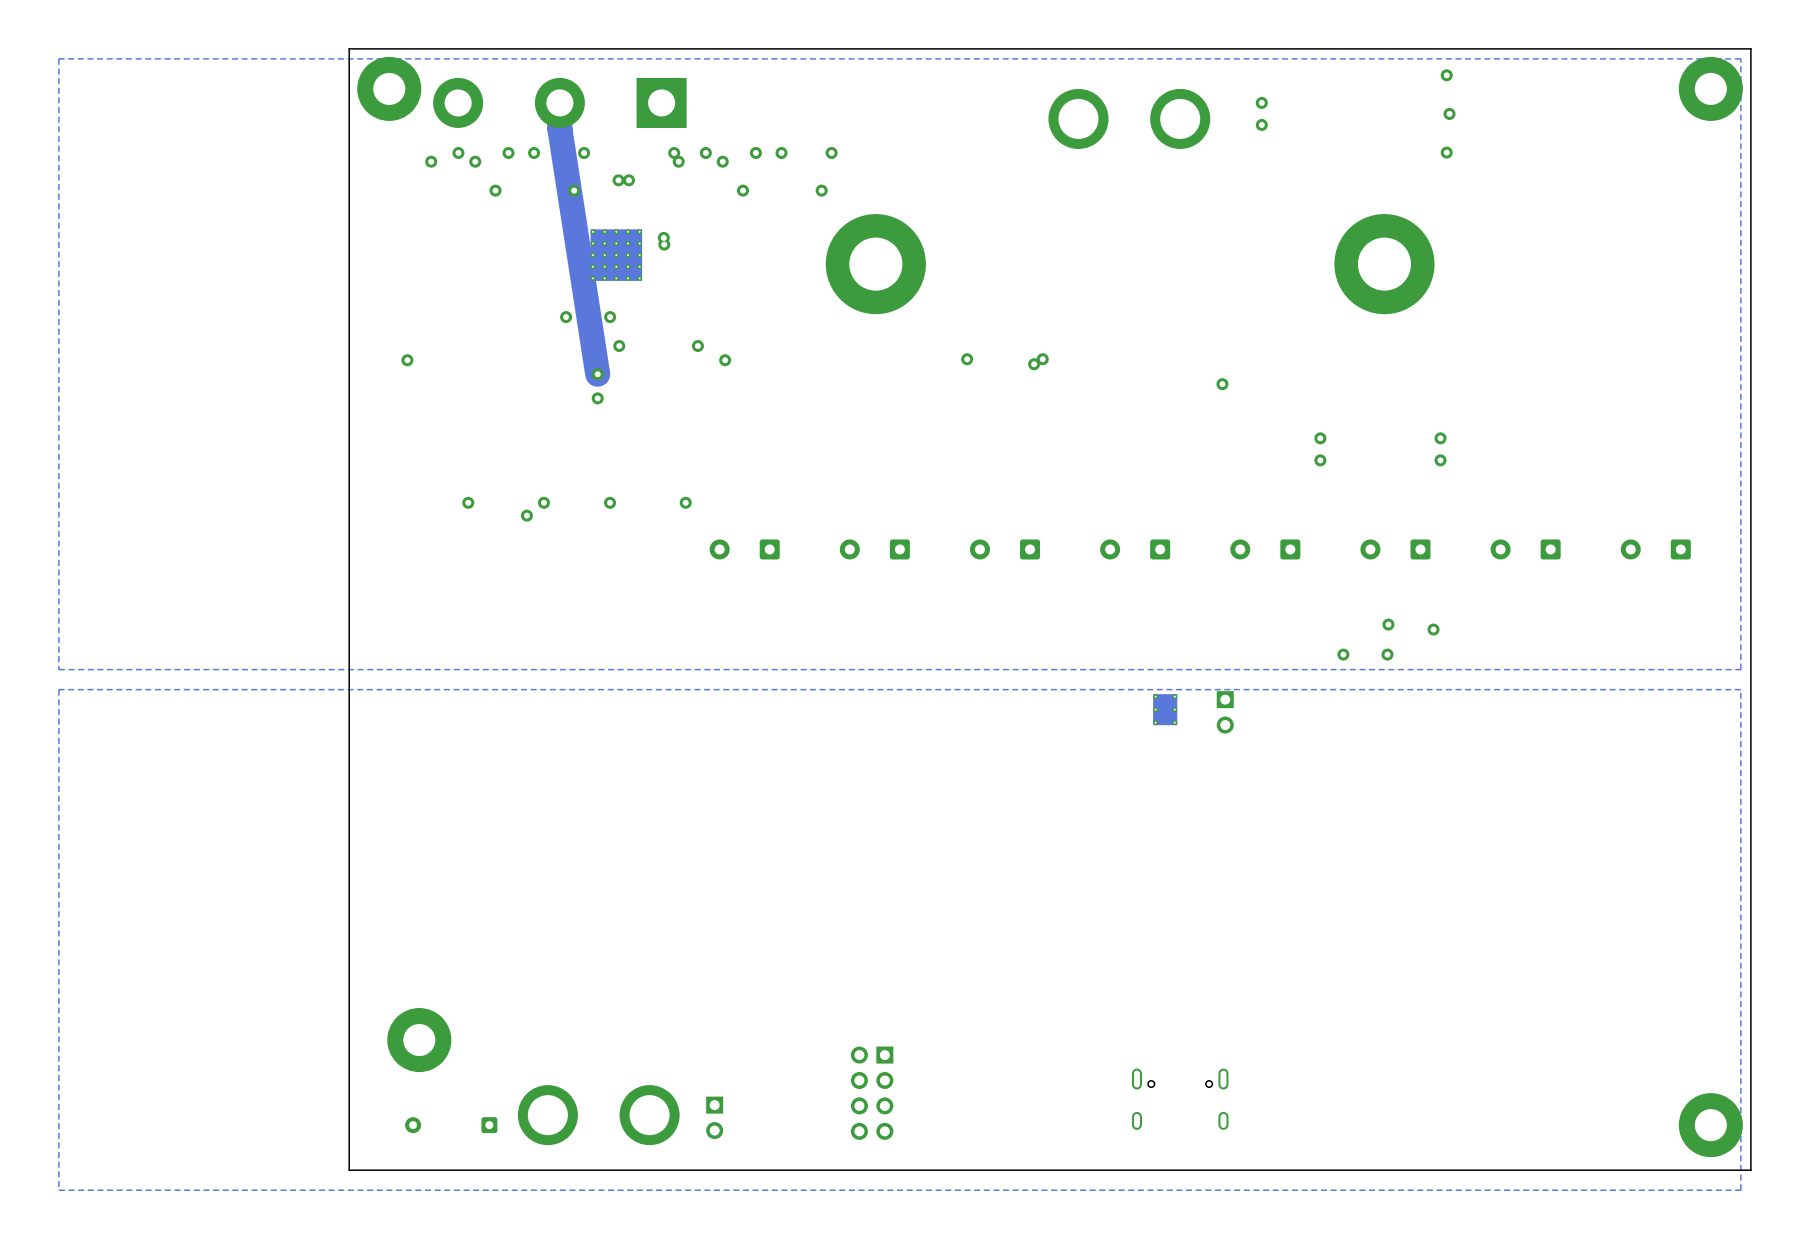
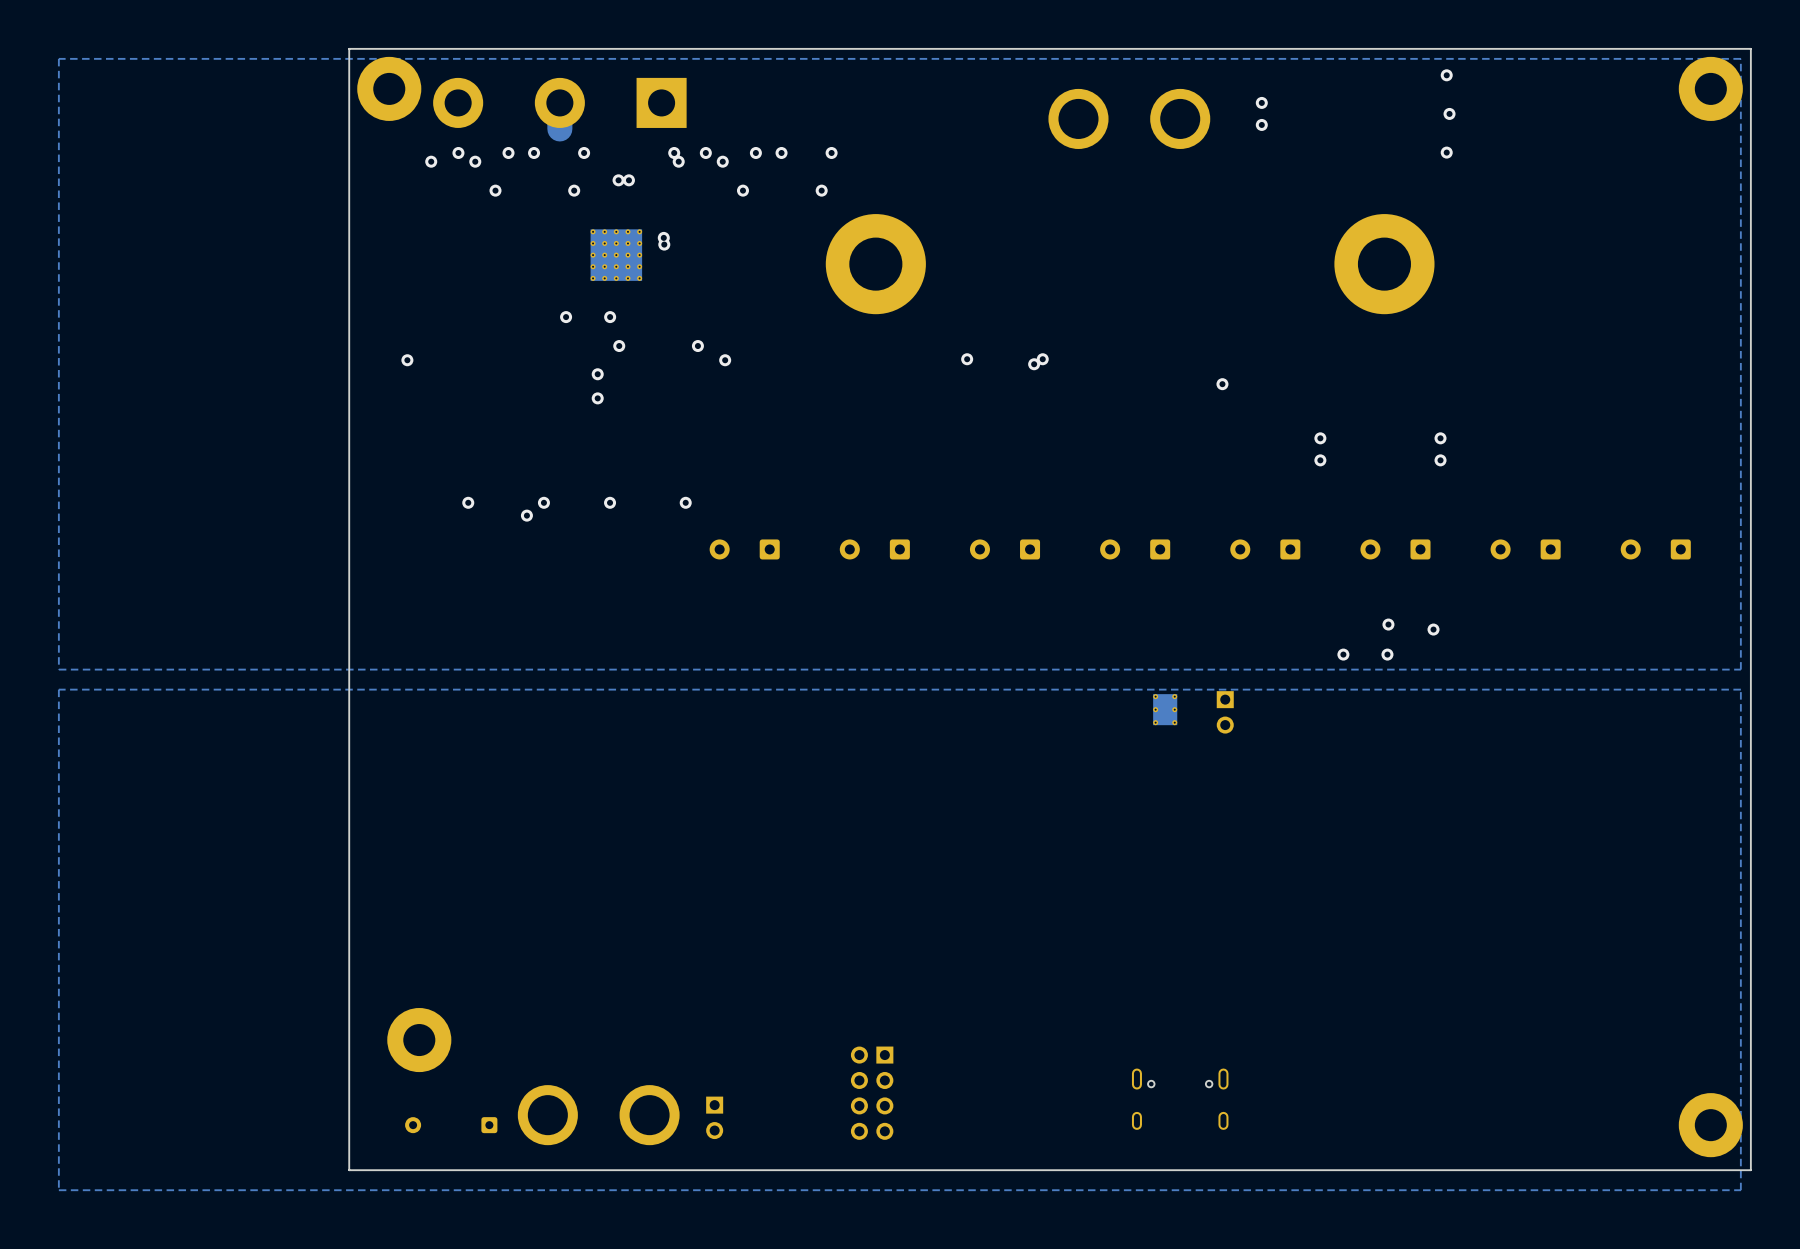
track: (559, 128) (597, 374) -> none

